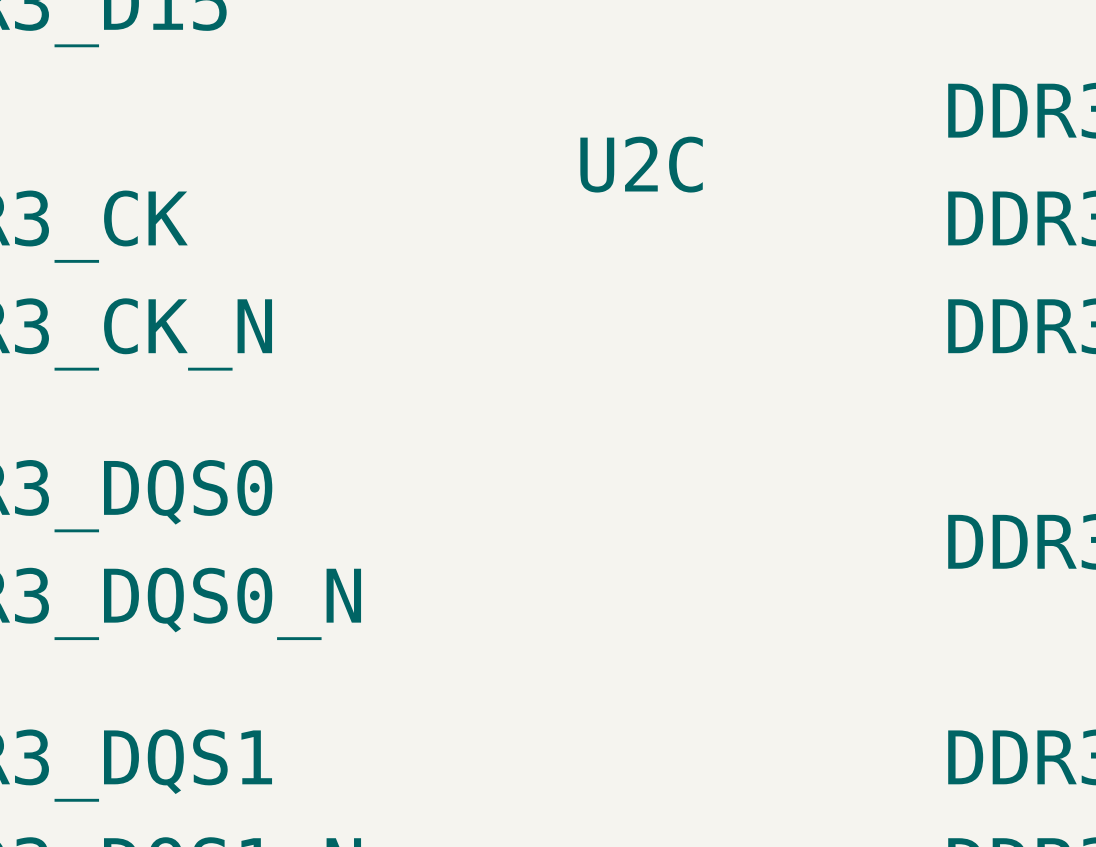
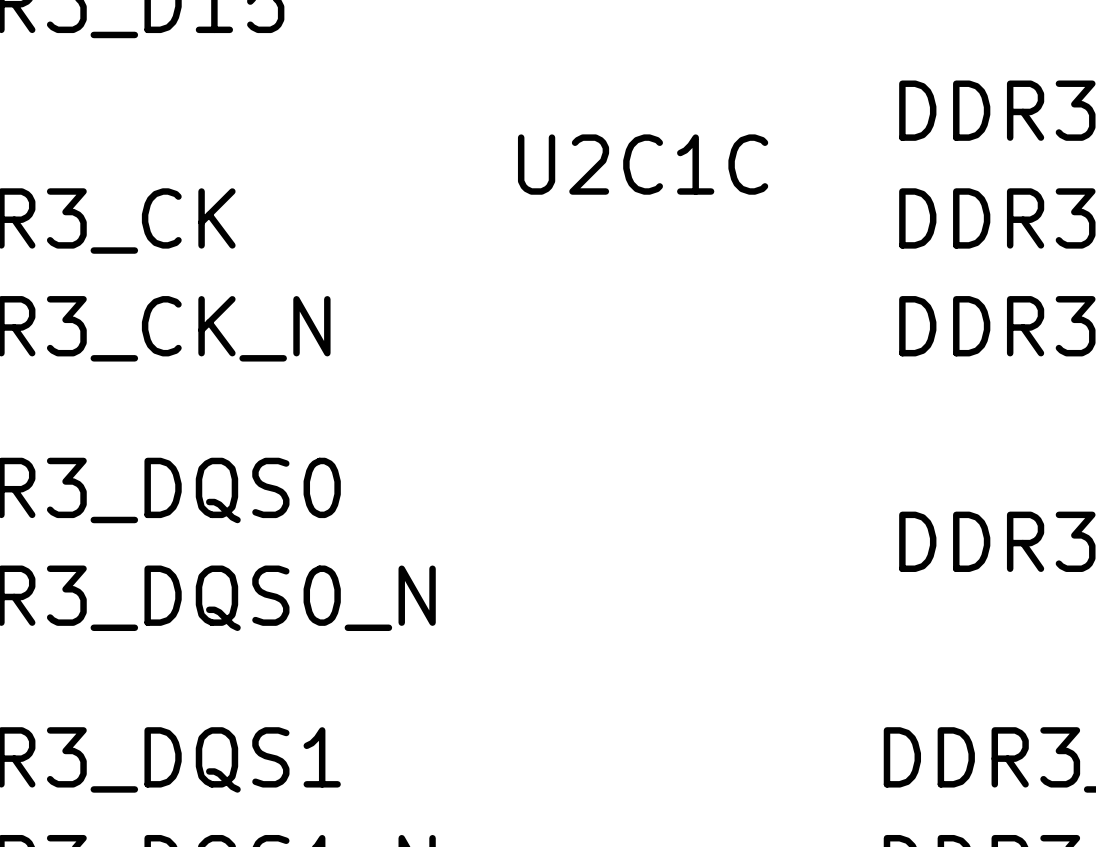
U2C name: U2C (641, 164) -> U2C1C (643, 164)

